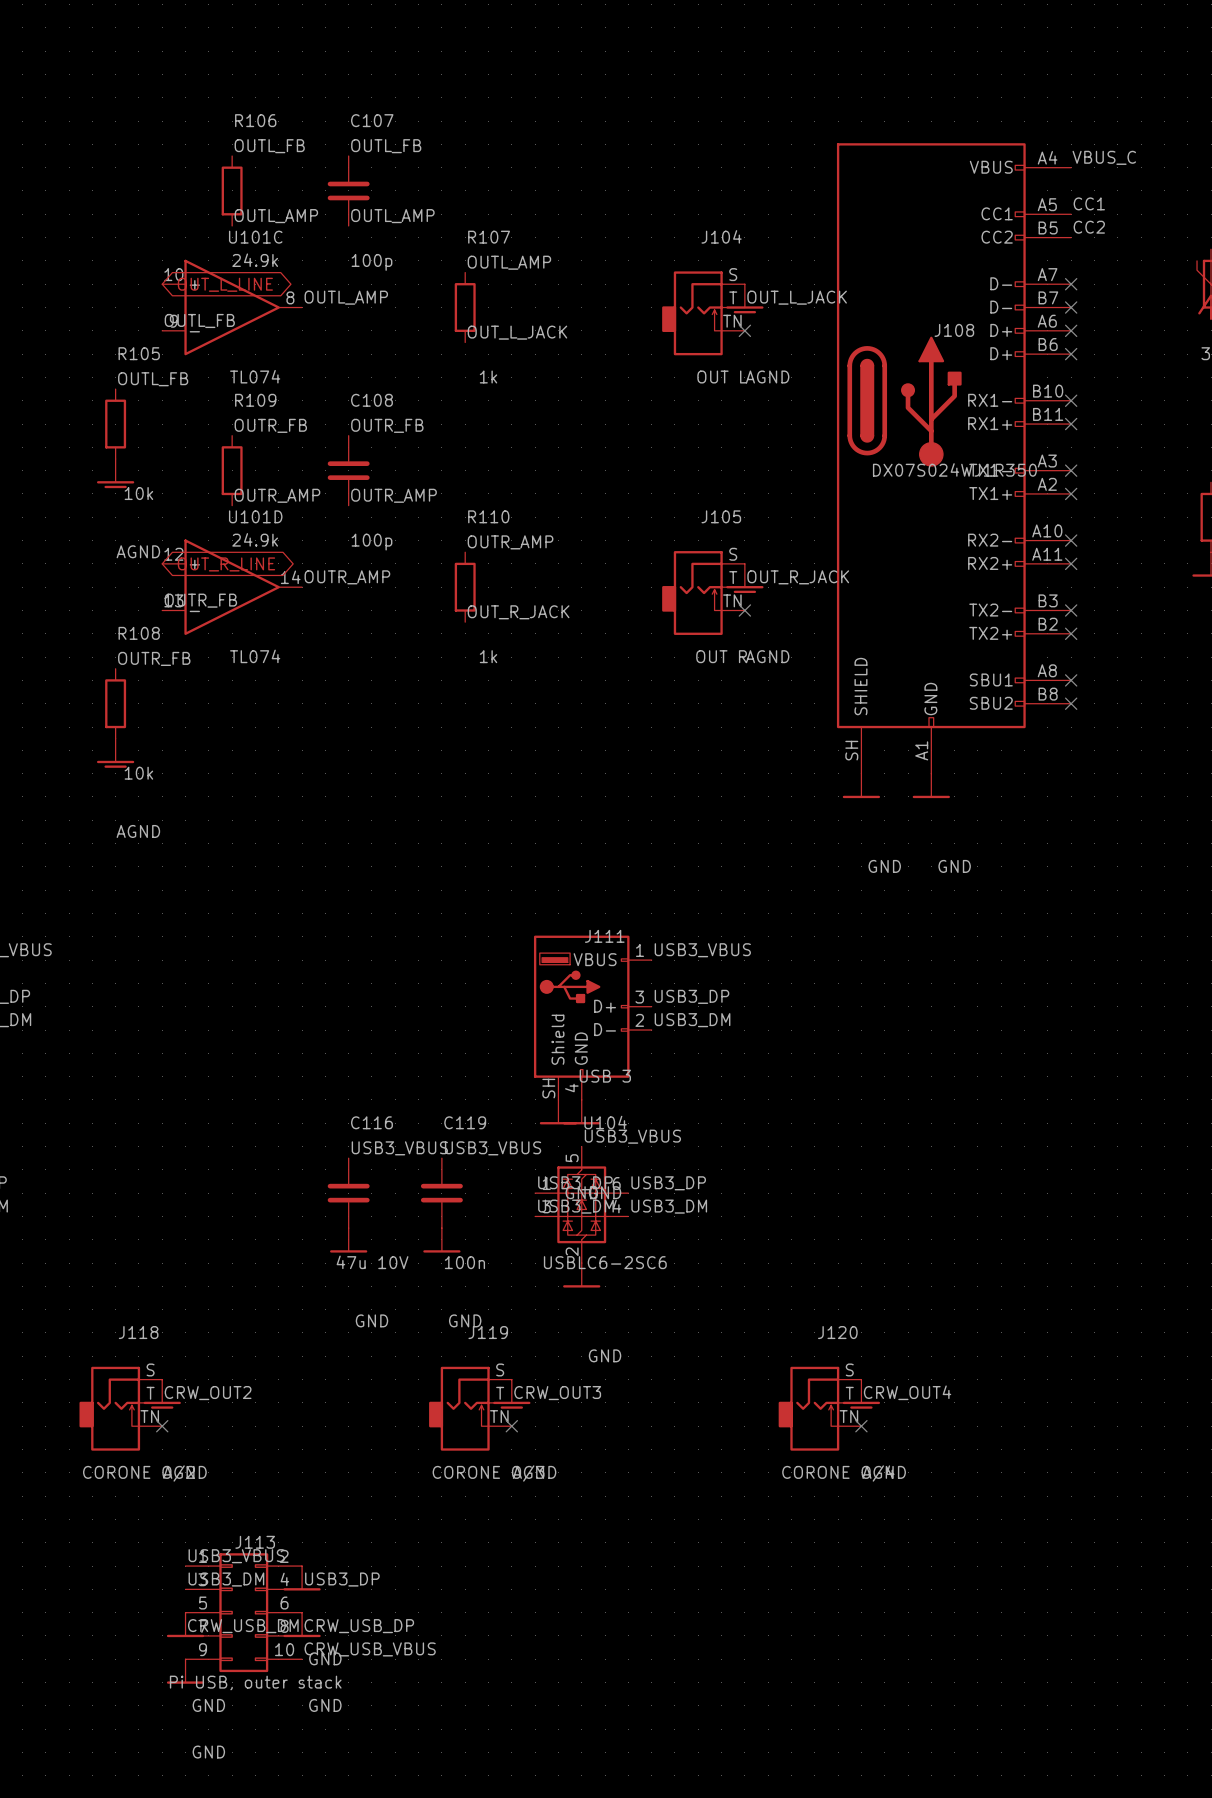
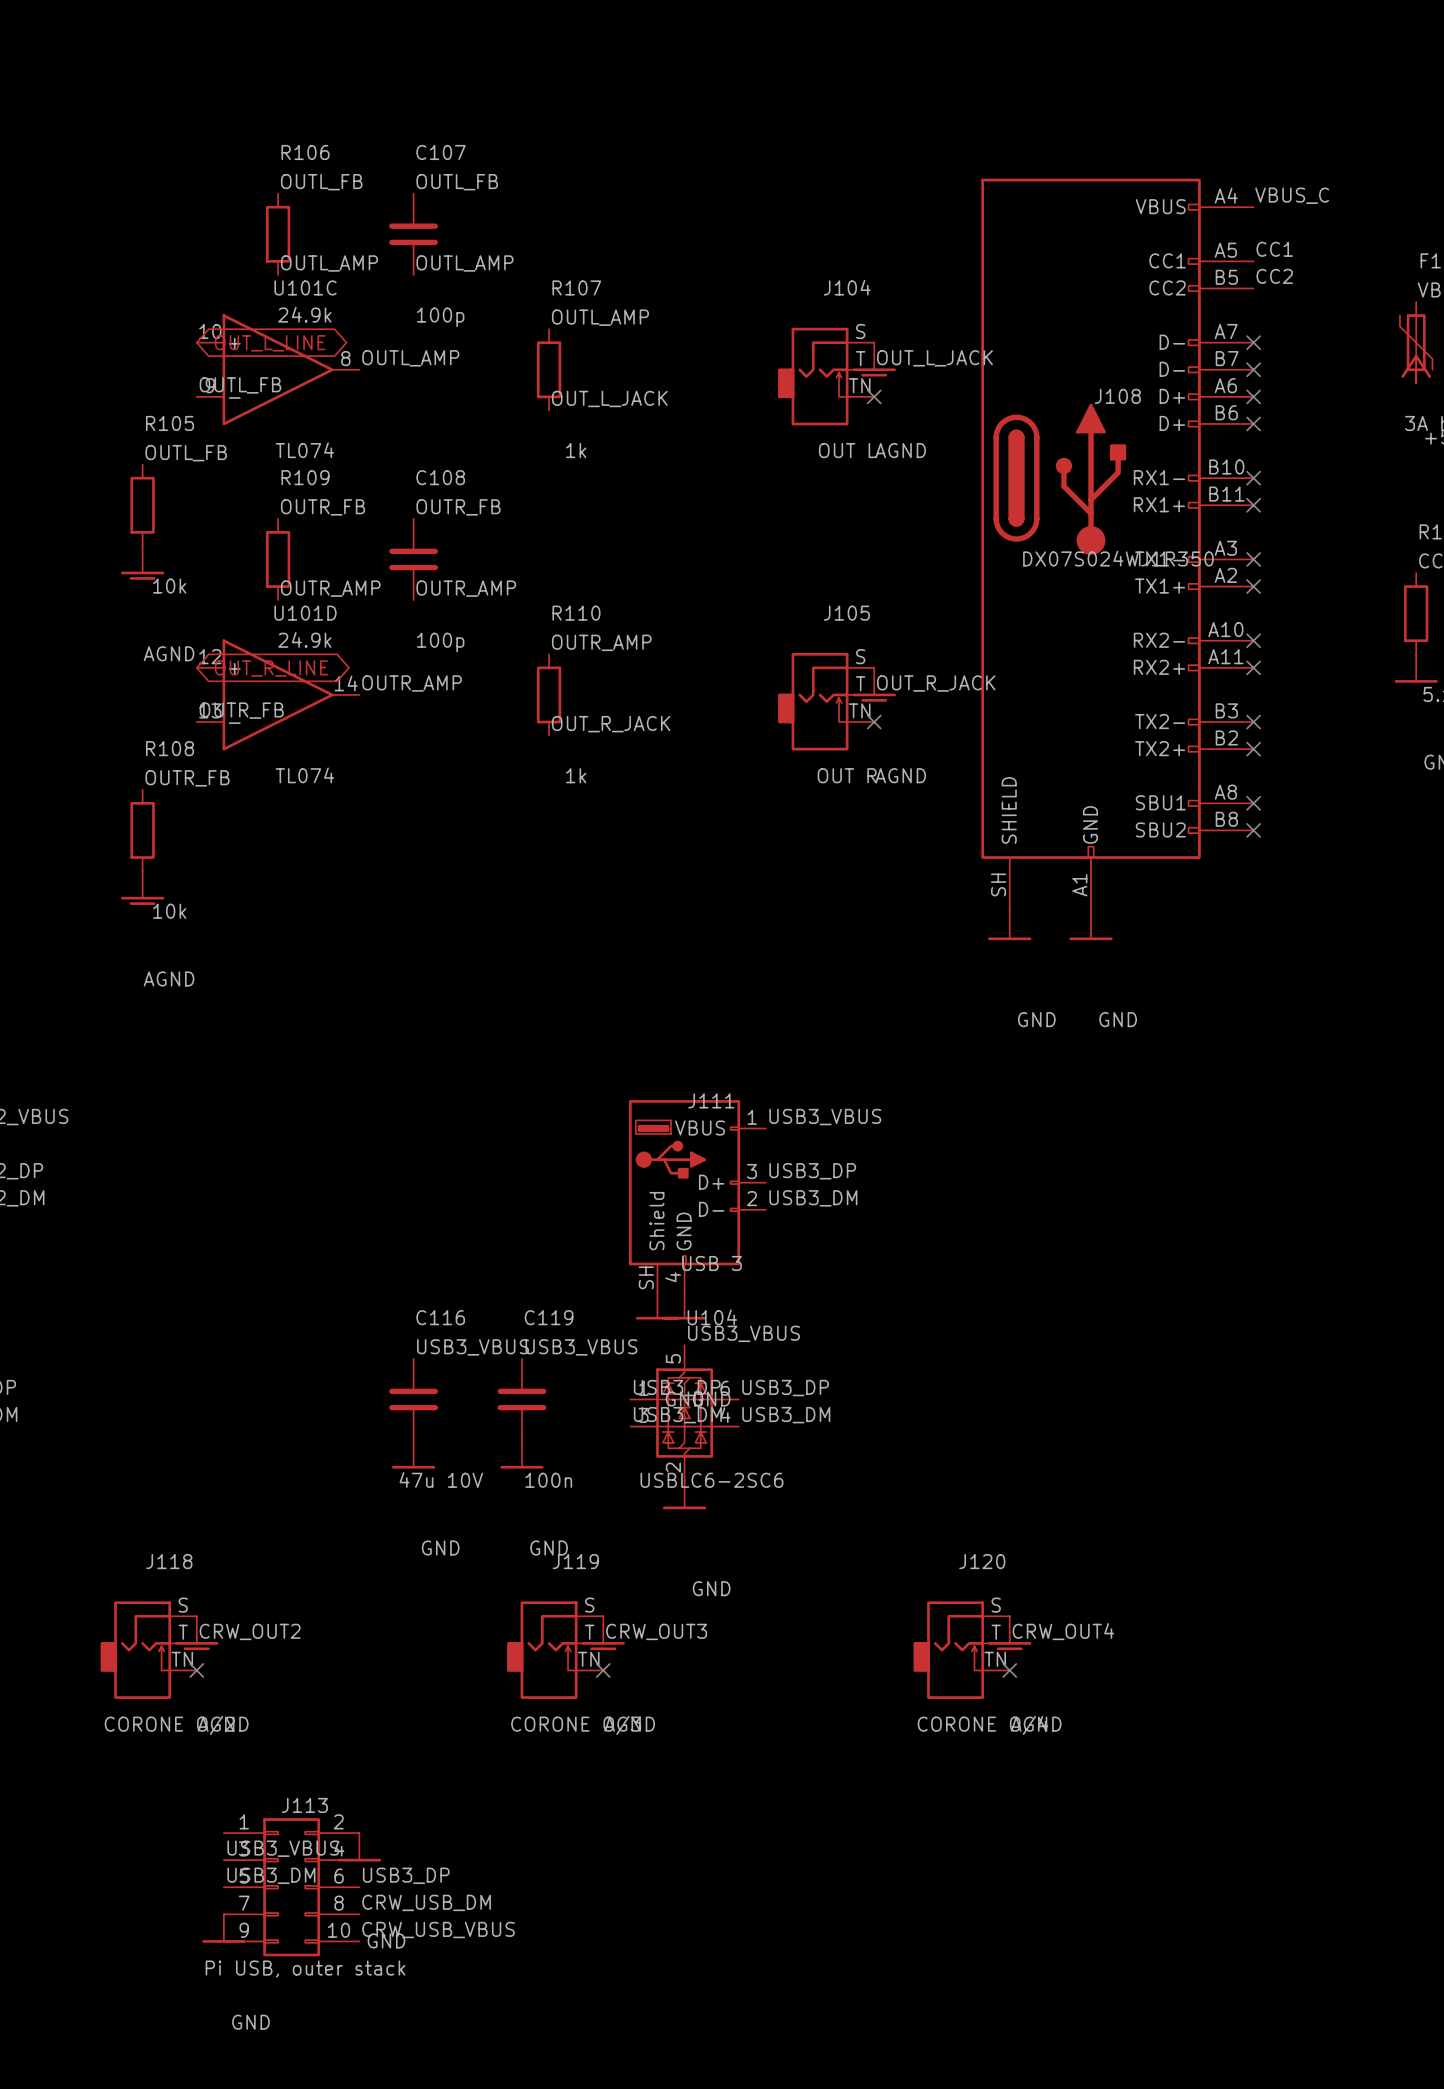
label: USB3_VBUS (236, 1556) -> none
label: USB3_DM (226, 1579) -> USB3_VBUS (283, 1848)
label position: USB3_DP (342, 1579) -> USB3_DP (406, 1875)
power symbol: GND (185, 1624) -> none
power symbol: GND (302, 1624) -> none
label: CRW_USB_DM (243, 1626) -> USB3_DM (271, 1875)
label: CRW_USB_DP (359, 1626) -> CRW_USB_DM (426, 1902)
power symbol: none -> GND (223, 1928)
power symbol: GND (185, 1671) -> none

